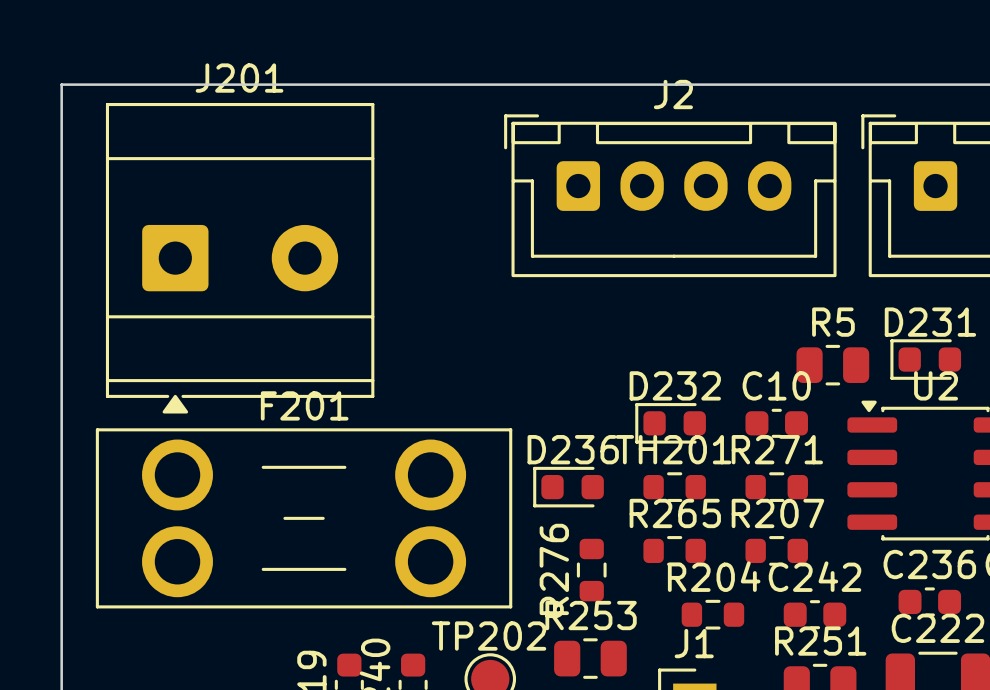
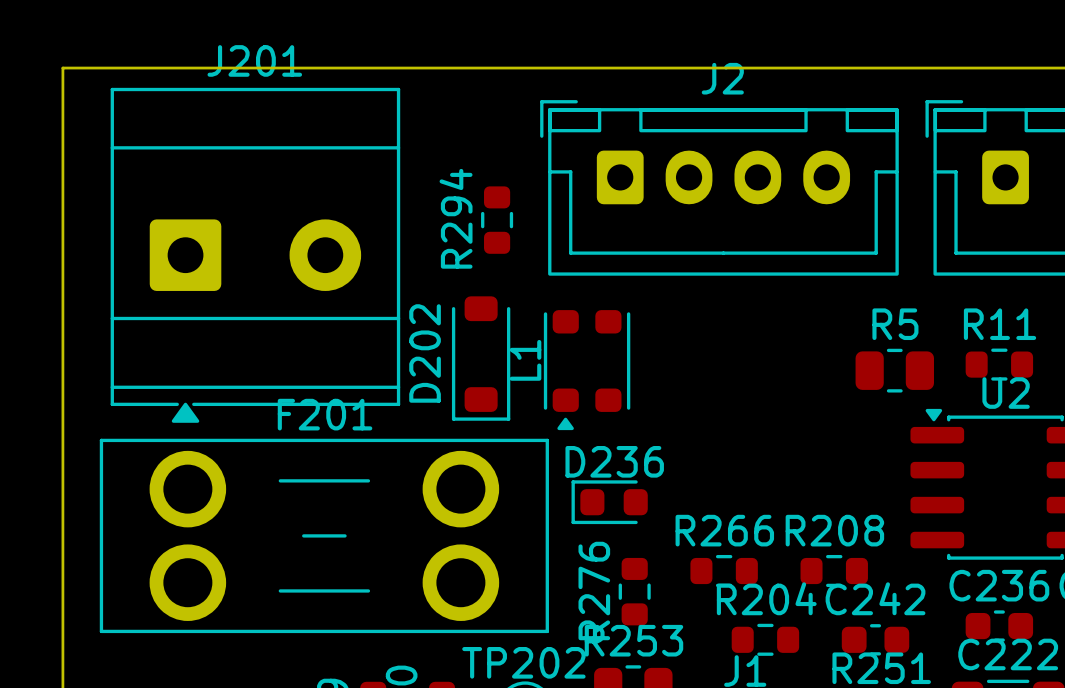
R294: none -> (497, 220)
D202: none -> (481, 358)
D231: (925, 359) -> none
R11: none -> (999, 364)
L1: none -> (587, 370)
D232: (670, 423) -> none
C10: (776, 423) -> none
TH201: (674, 487) -> none
R271: (776, 487) -> none
R265 name: R265 (675, 513) -> R266 (724, 530)
R207 name: R207 (777, 513) -> R208 (834, 530)

